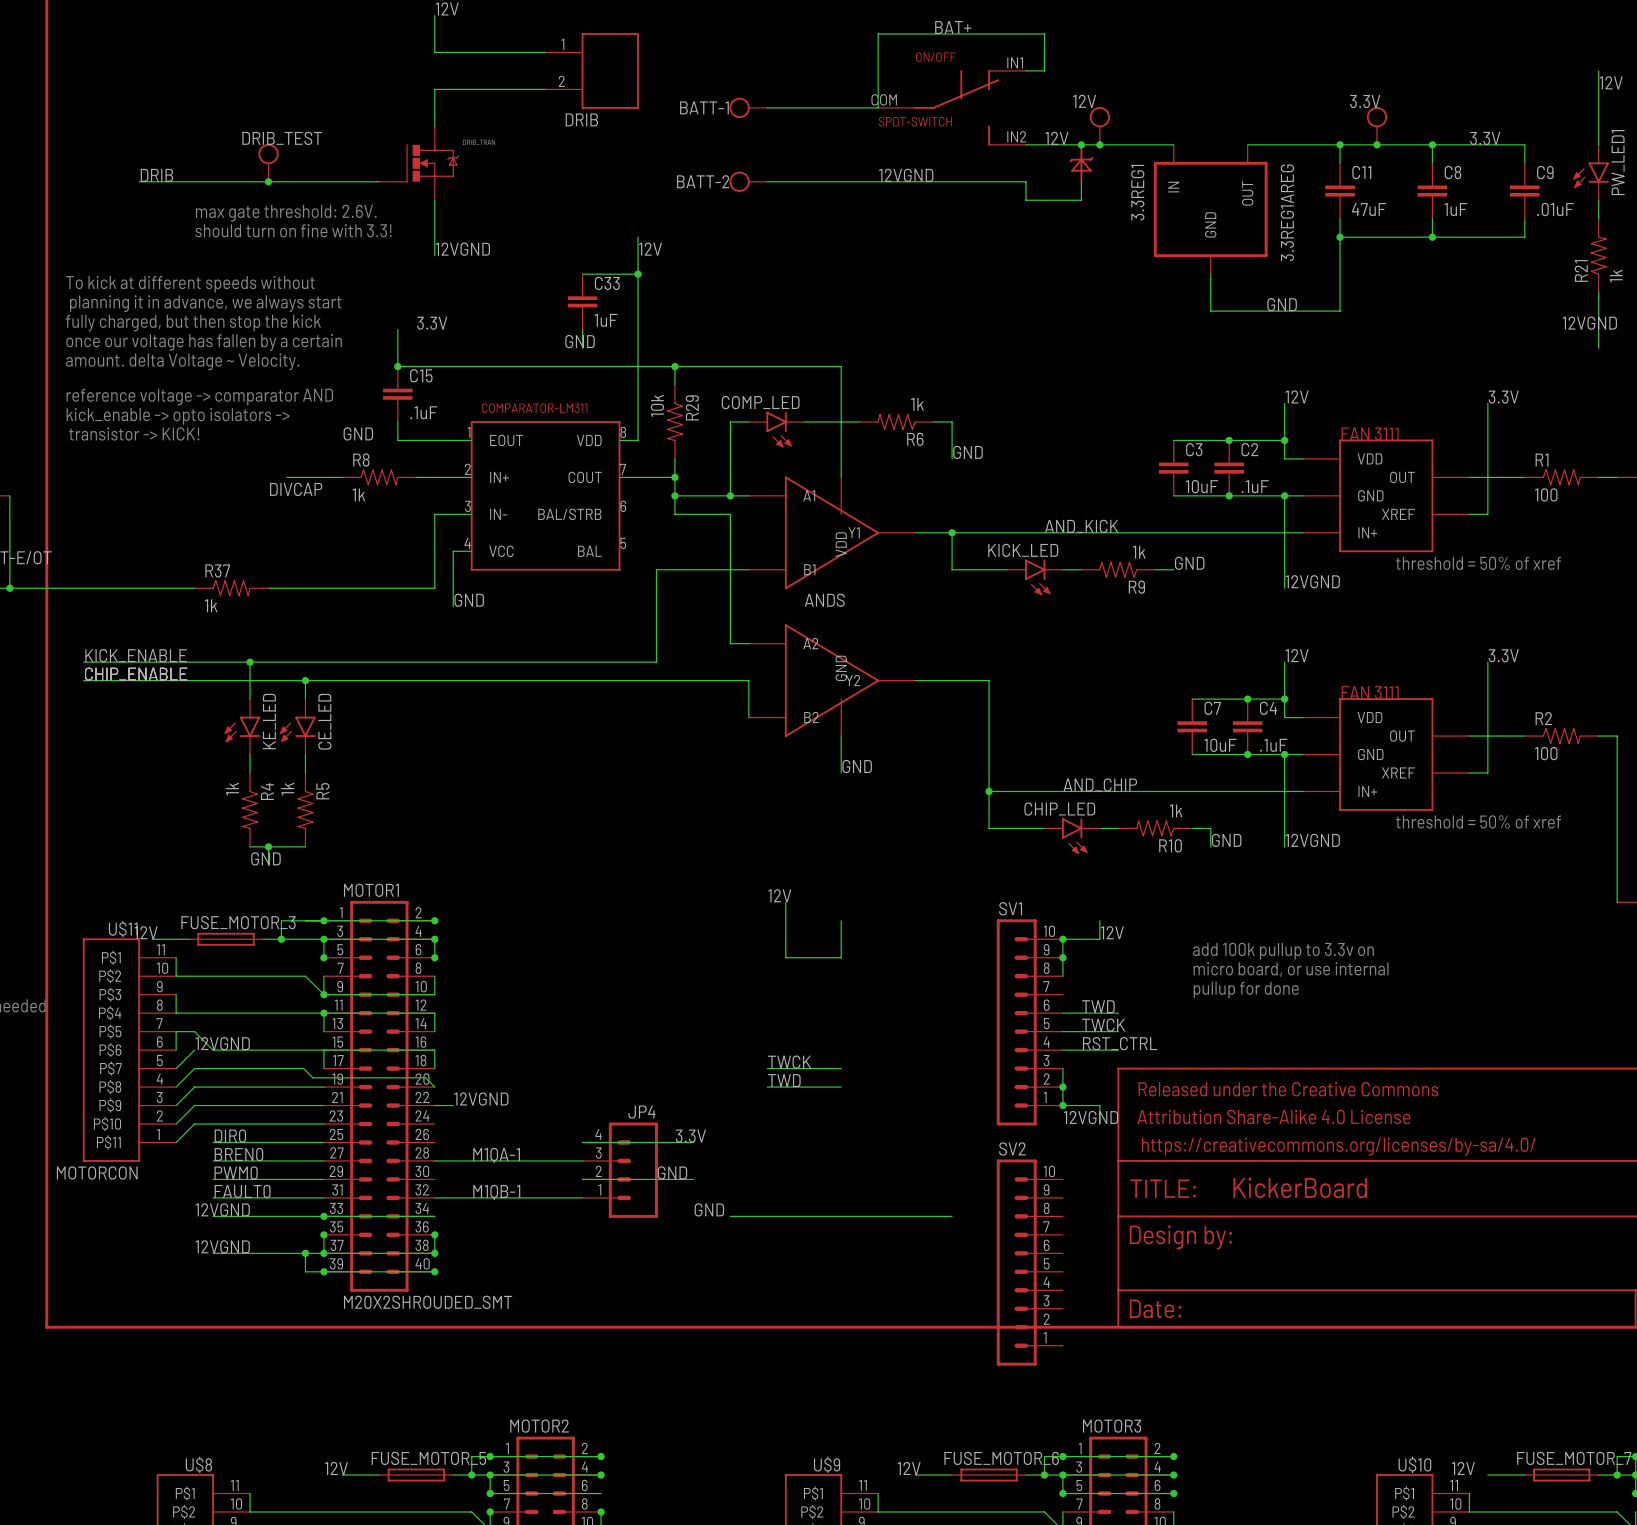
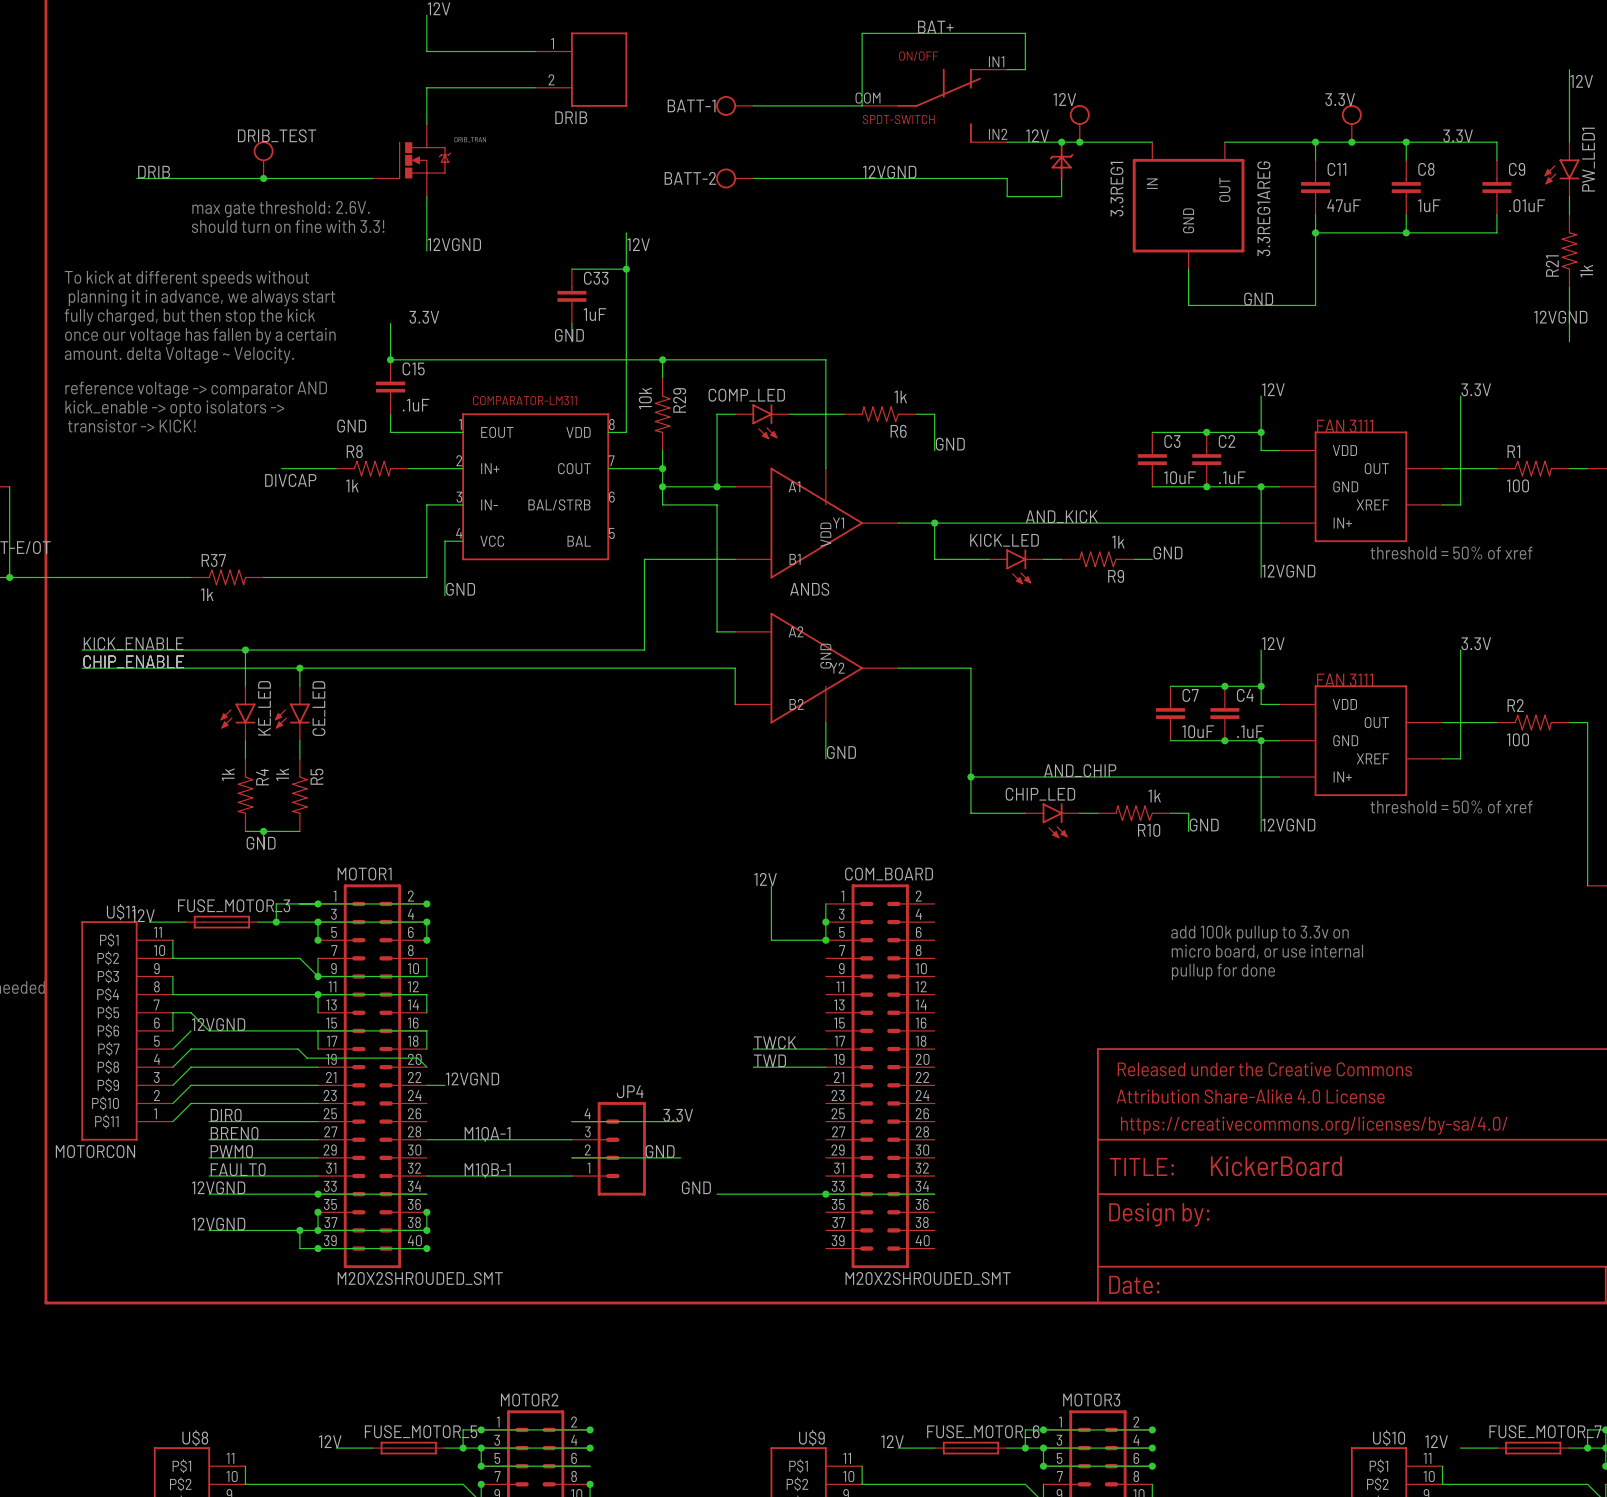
wire: (1099, 920) (1099, 939) (1062, 939) (1062, 976) -> none
label: 12V (1112, 932) -> none
junction: none -> (825, 922)
junction: (1062, 939) -> none
junction: none -> (825, 940)
junction: (1062, 957) -> none
label: TWD (1098, 1006) -> none
wire: (1062, 1013) (1118, 1013) -> none
SV1: (1029, 1022) -> none
label: TWCK (1103, 1025) -> none
wire: (1062, 1031) (1118, 1031) -> none
label: RST_CTRL (1120, 1043) -> none
wire: (1062, 1050) (1118, 1050) -> none
wire: (1062, 1068) (1062, 1105) (1099, 1105) (1099, 1124) -> none
junction: (1062, 1087) -> none
COM_BOARD: none -> M20X2SHROUDED_SMT (880, 1076)
junction: (1062, 1105) -> none
label: 12VGND (1091, 1117) -> none
junction: none -> (825, 1194)
SV2: (1029, 1262) -> none

